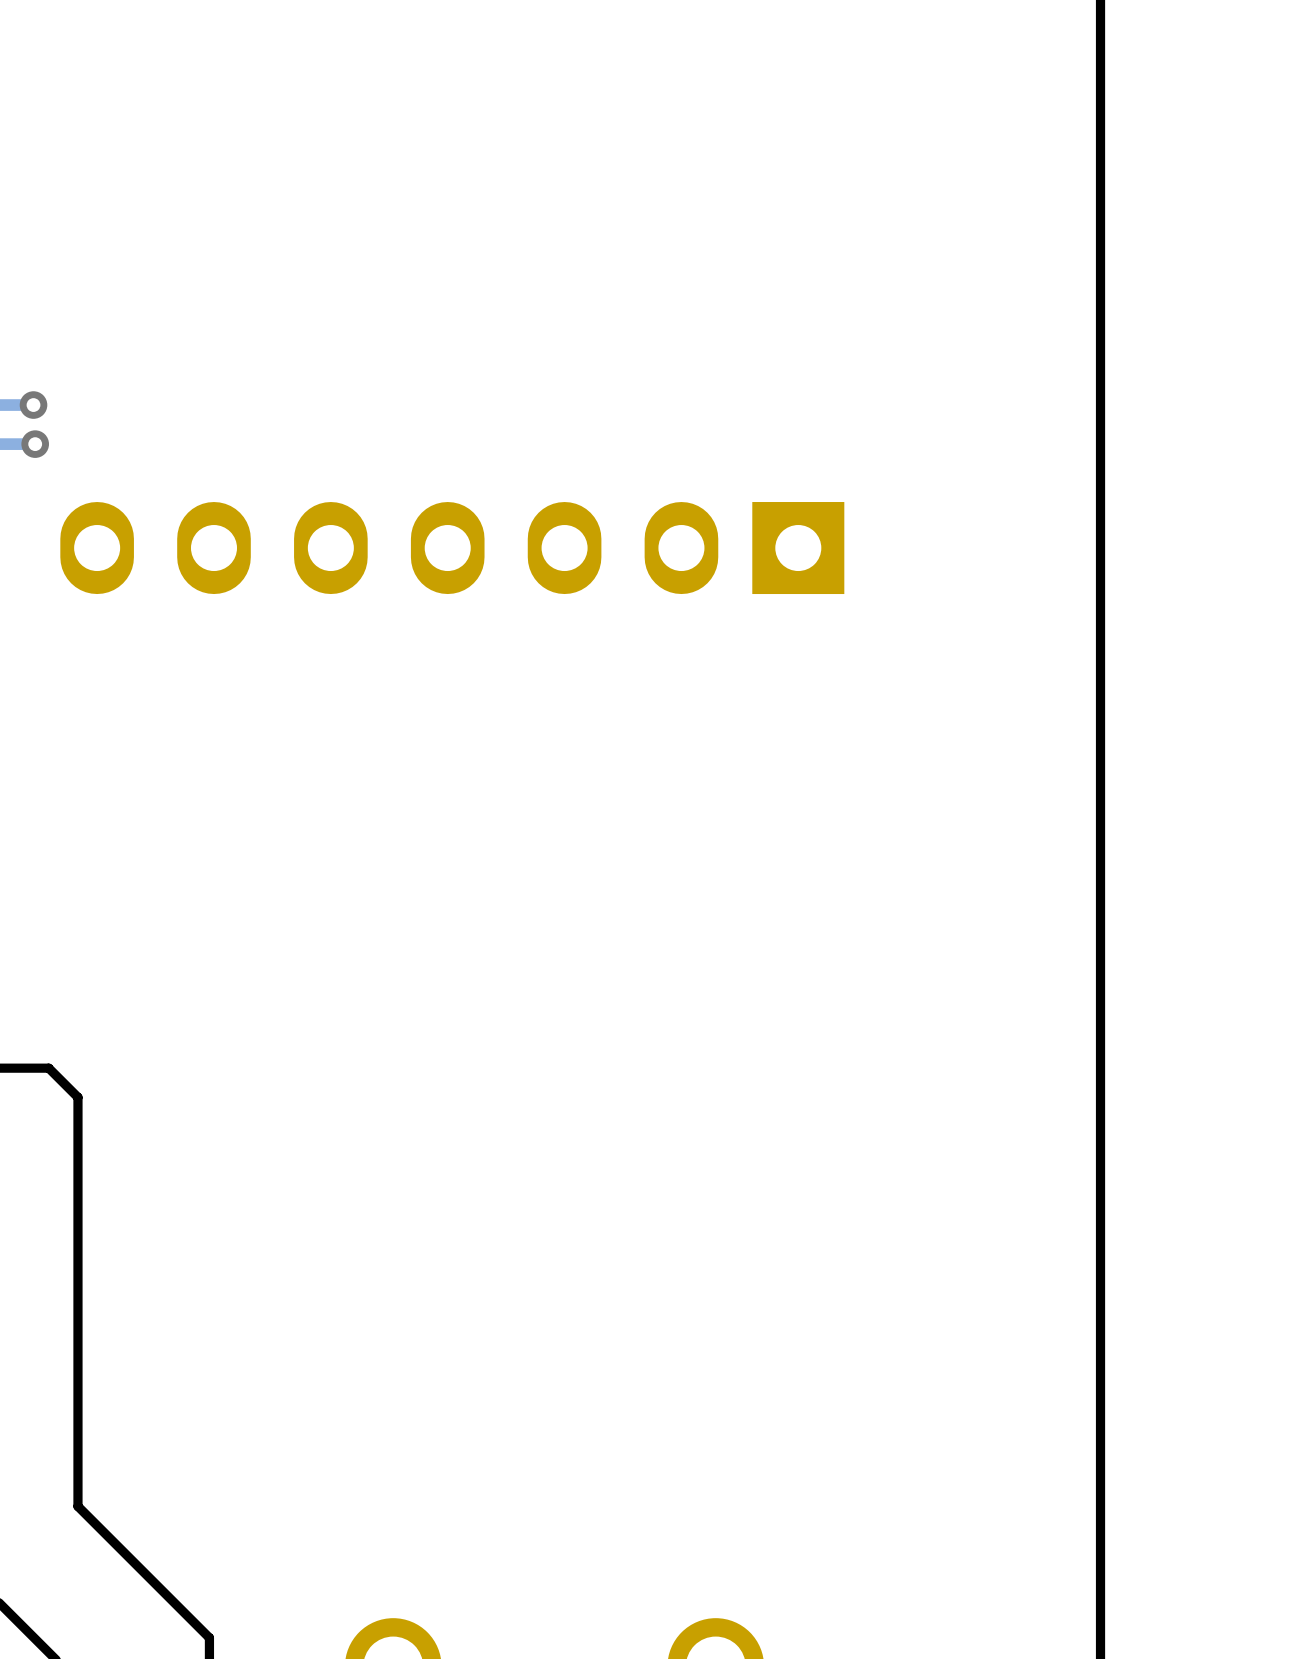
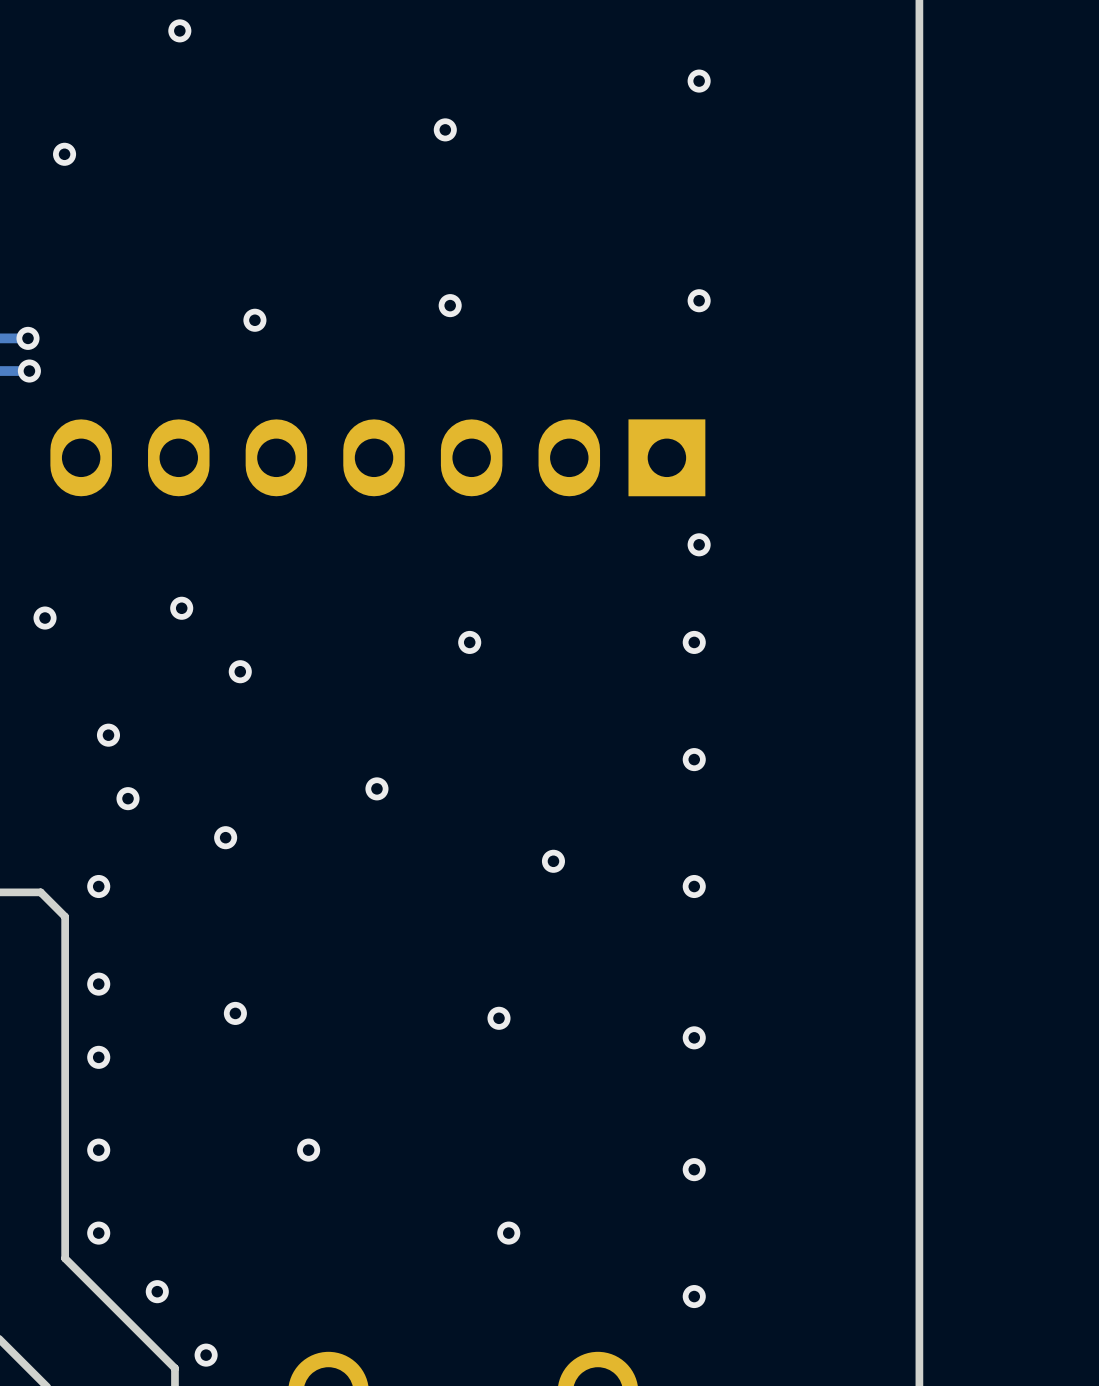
via: none -> (179, 30)
via: none -> (699, 81)
via: none -> (445, 129)
via: none -> (64, 154)
via: none -> (699, 300)
via: none -> (450, 305)
via: none -> (254, 320)
via: none -> (699, 544)
via: none -> (181, 608)
via: none -> (45, 618)
via: none -> (469, 642)
via: none -> (694, 642)
via: none -> (240, 671)
via: none -> (108, 735)
via: none -> (694, 759)
via: none -> (376, 788)
via: none -> (128, 798)
via: none -> (225, 837)
via: none -> (553, 861)
via: none -> (98, 886)
via: none -> (694, 886)
via: none -> (98, 984)
via: none -> (235, 1013)
via: none -> (498, 1018)
via: none -> (694, 1037)
via: none -> (98, 1057)
via: none -> (98, 1150)
via: none -> (308, 1150)
via: none -> (694, 1169)
via: none -> (98, 1233)
via: none -> (508, 1233)
via: none -> (157, 1291)
via: none -> (694, 1296)
via: none -> (206, 1355)

